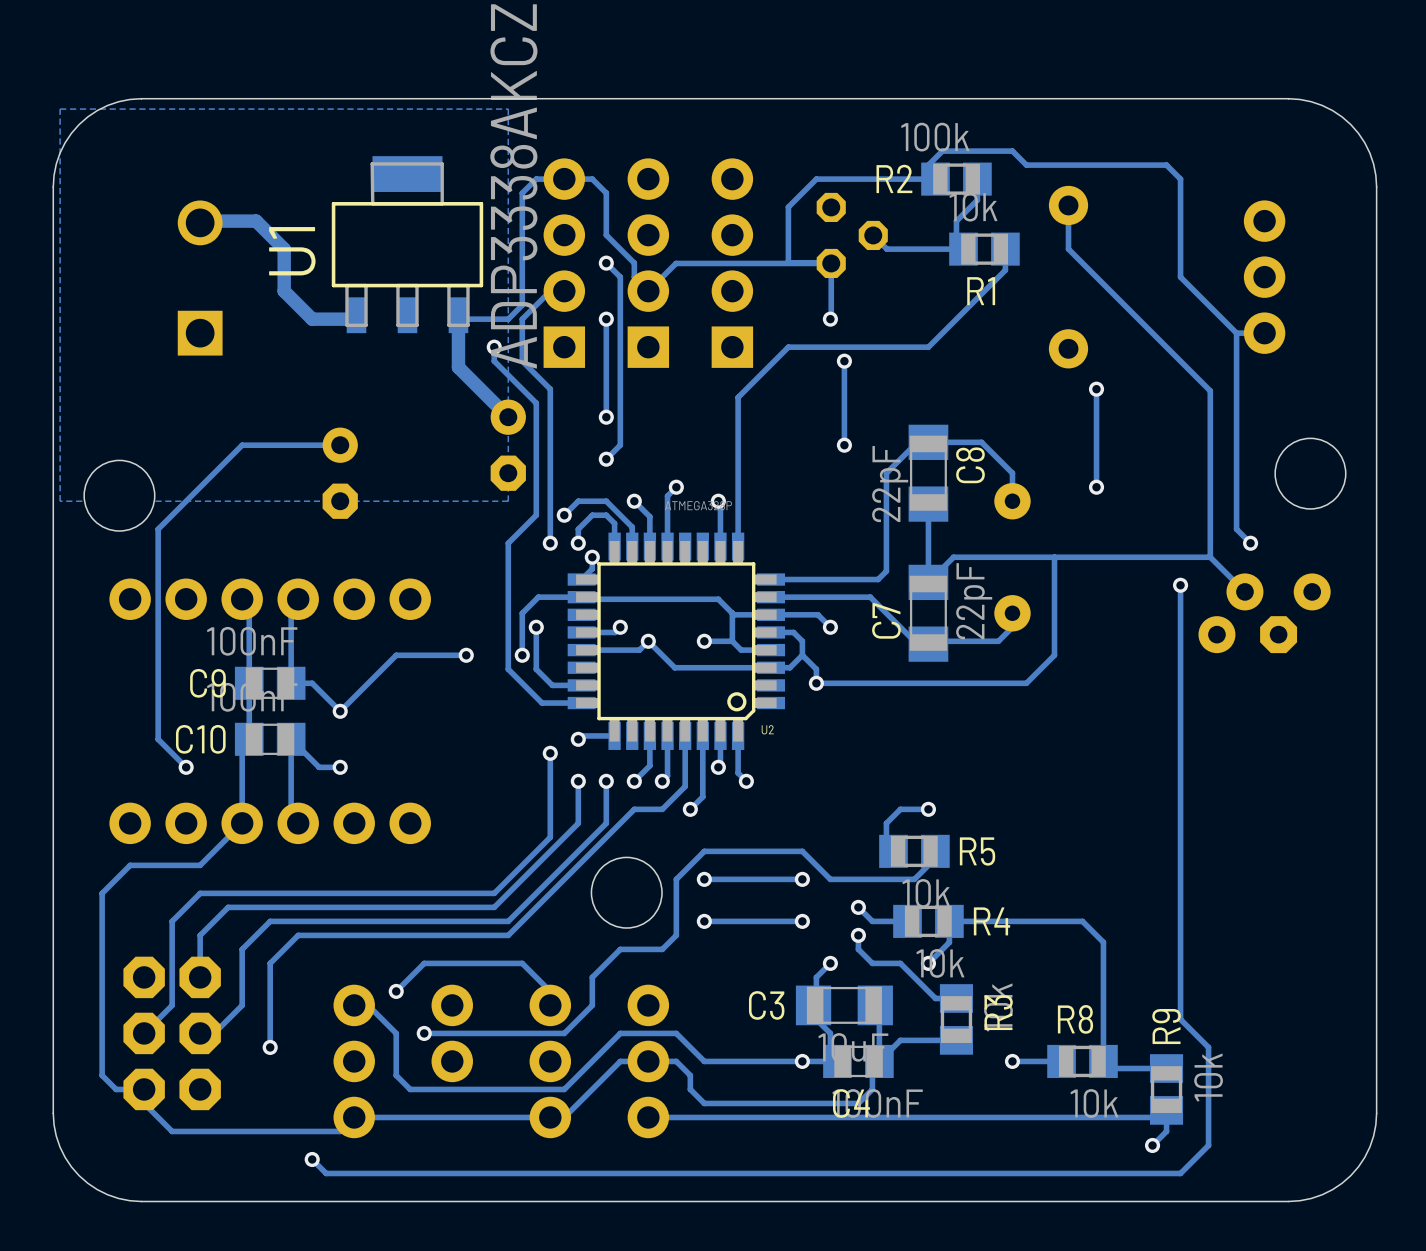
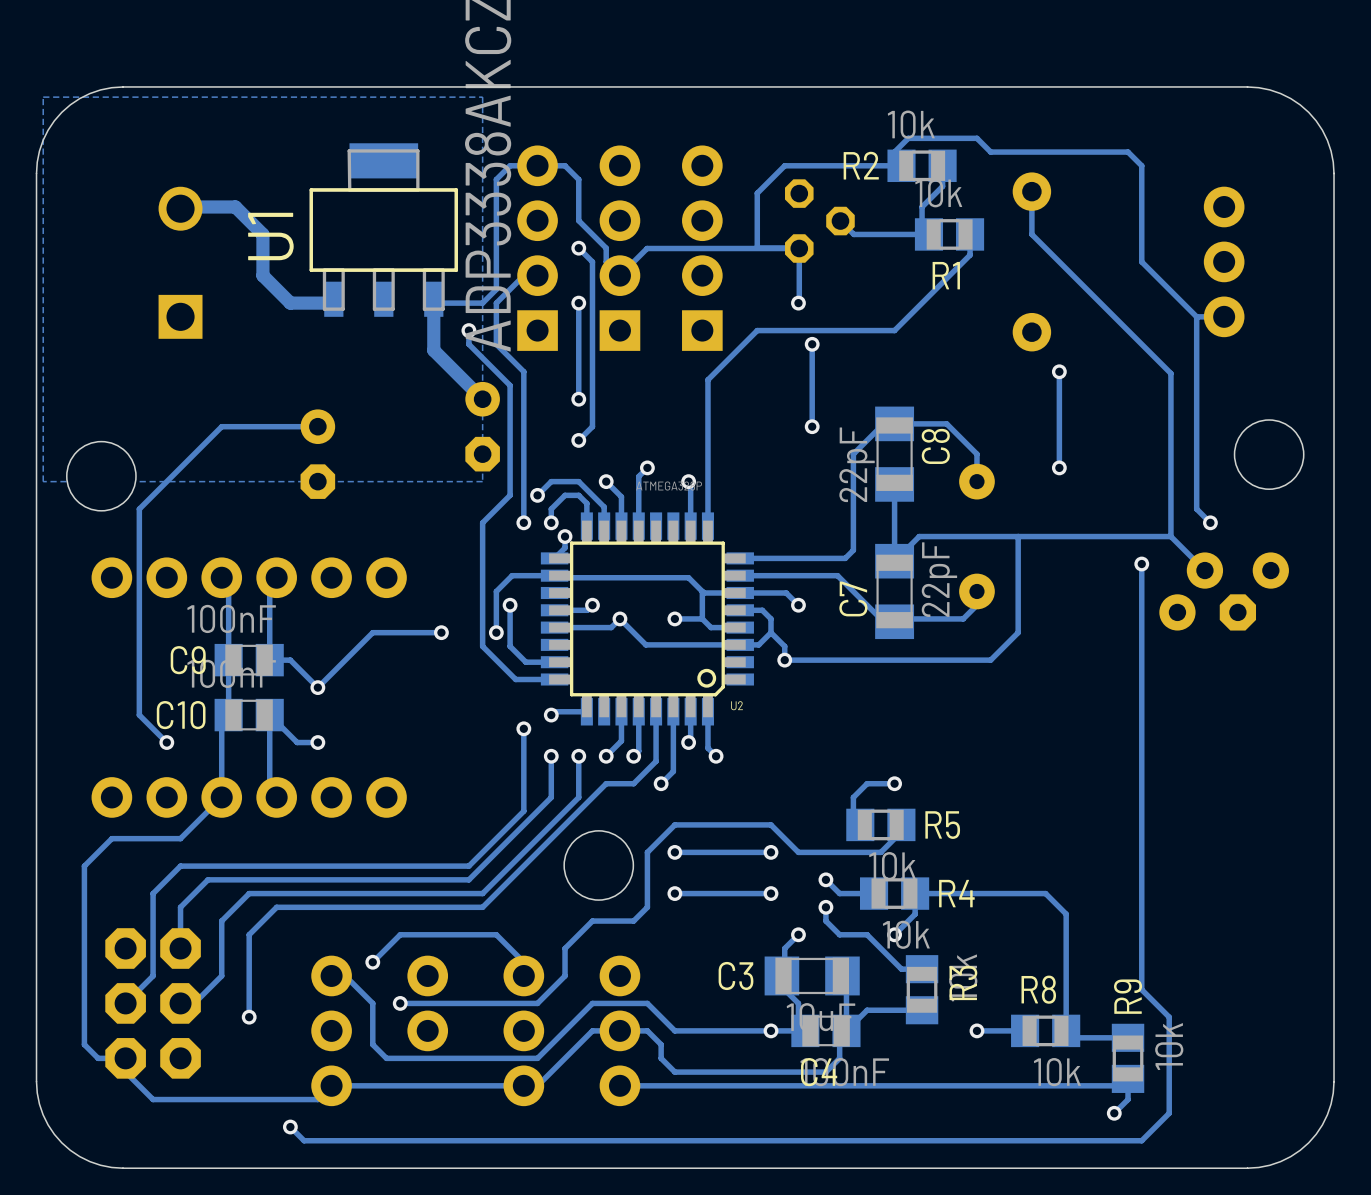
R2 value: 100k (935, 137) -> 10k (911, 124)

